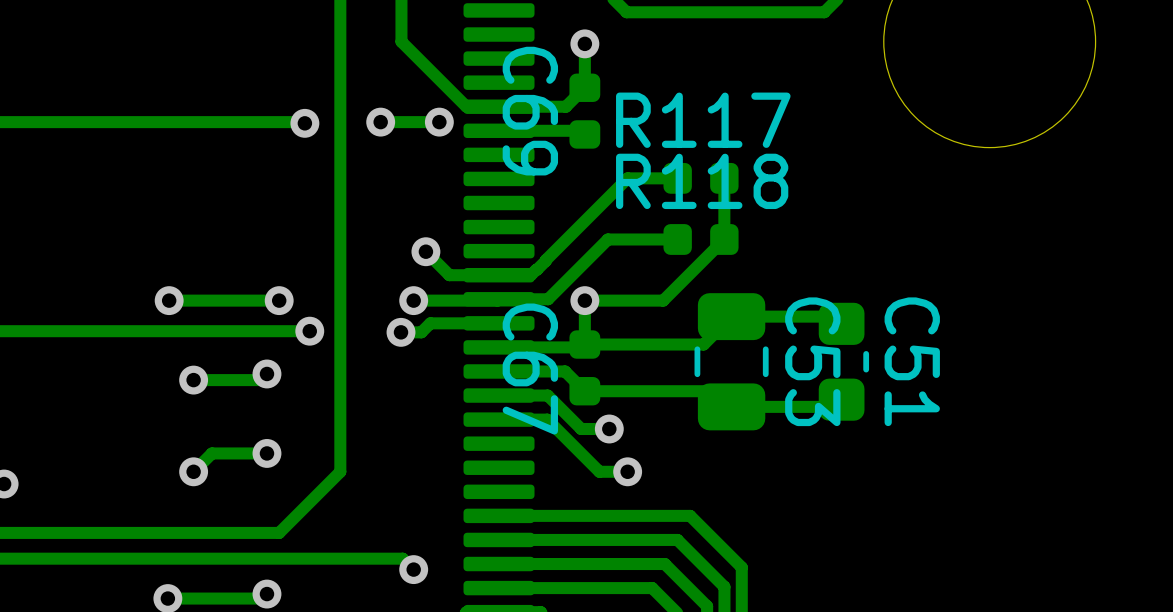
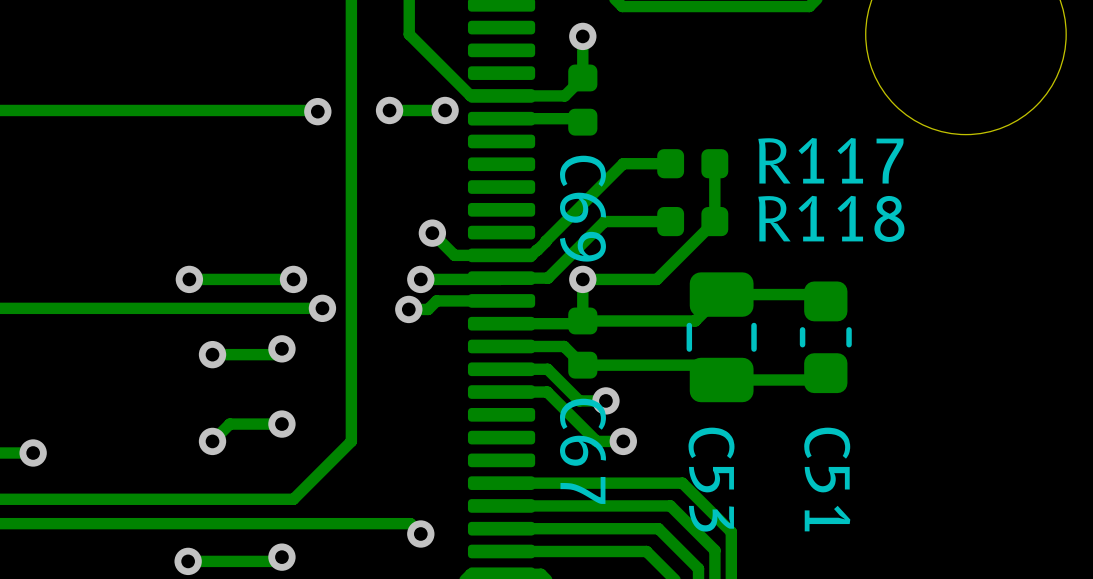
C69 name position: C69 (530, 111) -> C69 (582, 208)
R117 name position: R117 (703, 120) -> R117 (830, 160)
R118 name position: R118 (702, 181) -> R118 (831, 218)
C53 name position: C53 (812, 361) -> C53 (711, 479)
C51 name position: C51 (912, 361) -> C51 (827, 479)
C67 name position: C67 (530, 369) -> C67 (582, 451)

